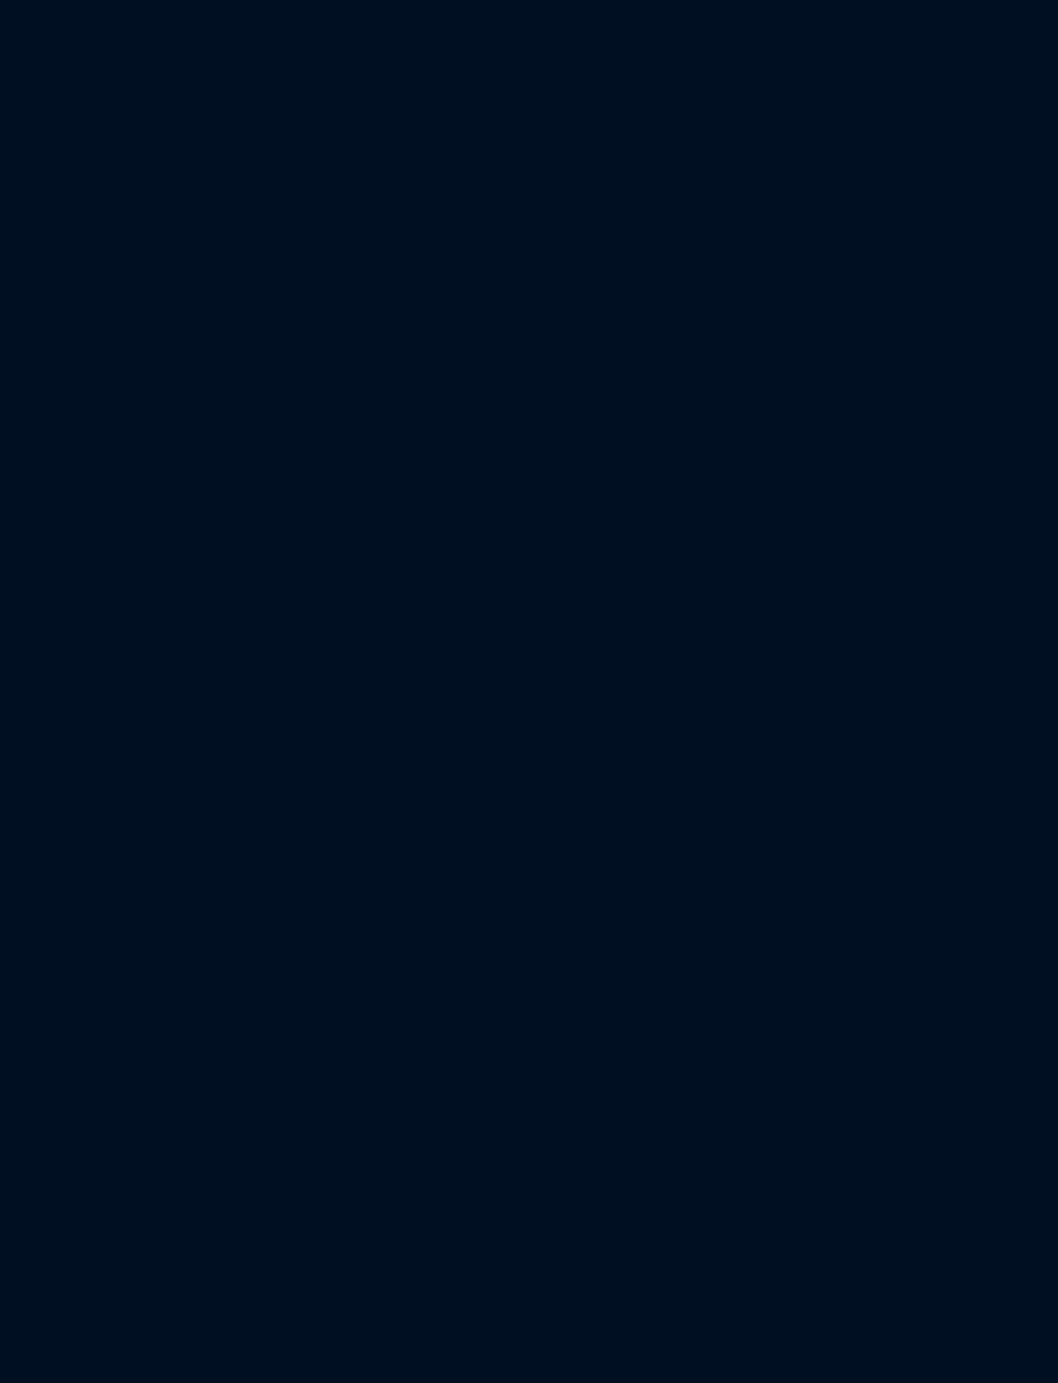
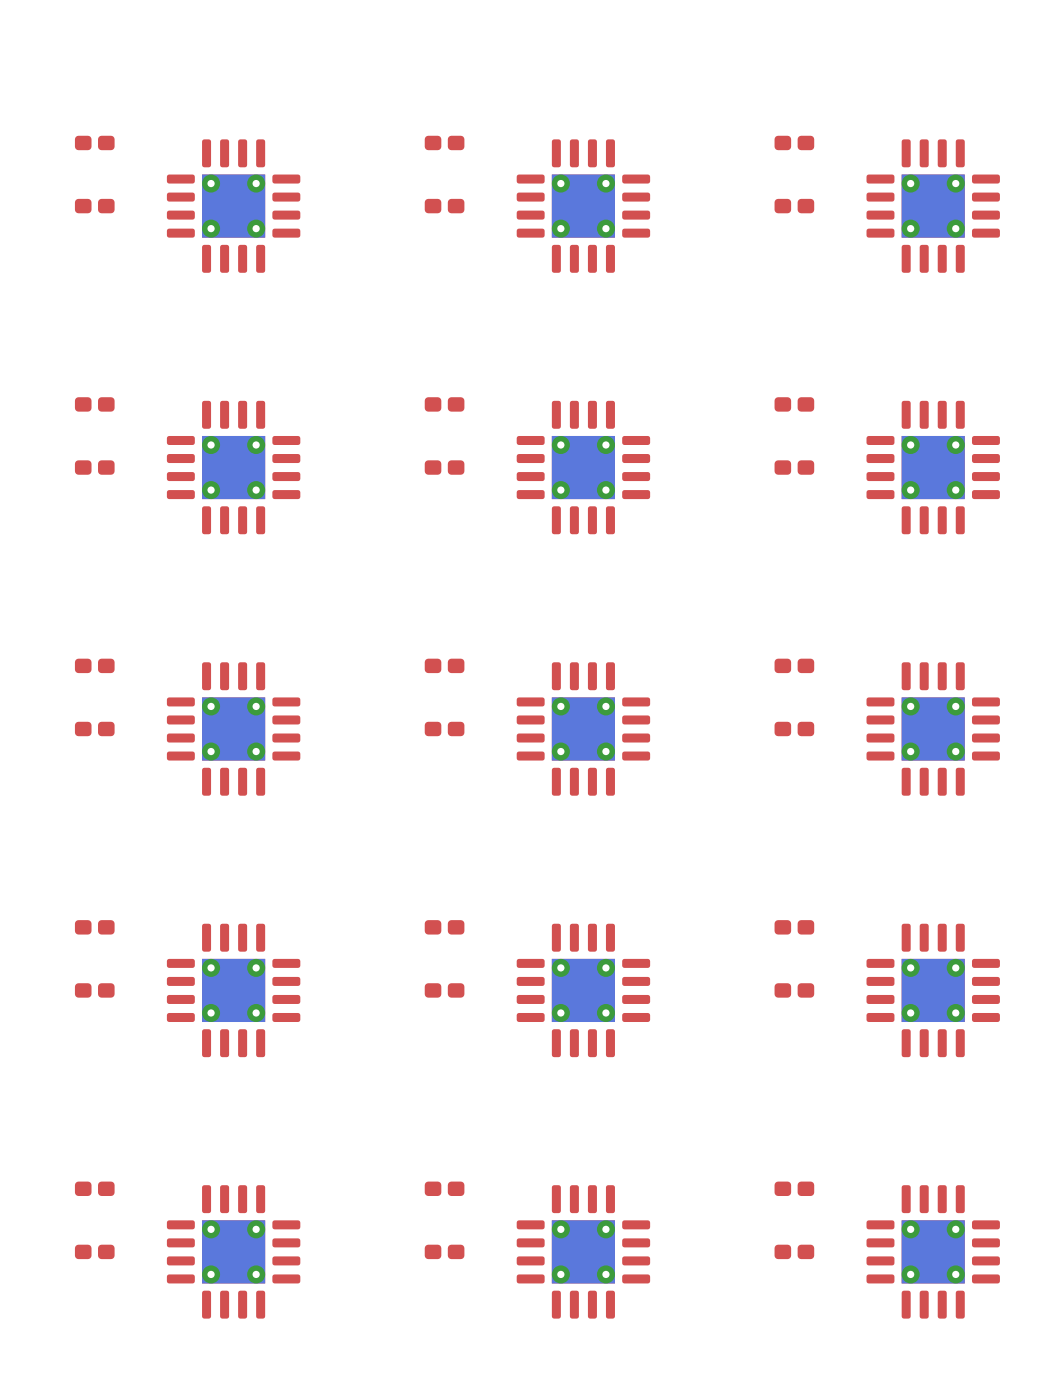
part: none -> (94, 142)
part: none -> (444, 142)
part: none -> (794, 142)
part: none -> (94, 206)
part: none -> (233, 206)
part: none -> (444, 206)
part: none -> (583, 206)
part: none -> (794, 206)
part: none -> (933, 206)
part: none -> (94, 404)
part: none -> (444, 404)
part: none -> (794, 404)
part: none -> (94, 467)
part: none -> (233, 467)
part: none -> (444, 467)
part: none -> (583, 467)
part: none -> (794, 467)
part: none -> (933, 467)
part: none -> (94, 665)
part: none -> (444, 665)
part: none -> (794, 665)
part: none -> (94, 728)
part: none -> (233, 728)
part: none -> (444, 728)
part: none -> (583, 728)
part: none -> (794, 728)
part: none -> (933, 728)
part: none -> (94, 927)
part: none -> (444, 927)
part: none -> (794, 927)
part: none -> (94, 990)
part: none -> (233, 990)
part: none -> (444, 990)
part: none -> (583, 990)
part: none -> (794, 990)
part: none -> (933, 990)
part: none -> (94, 1188)
part: none -> (444, 1188)
part: none -> (794, 1188)
part: none -> (94, 1251)
part: none -> (233, 1251)
part: none -> (444, 1251)
part: none -> (583, 1251)
part: none -> (794, 1251)
part: none -> (933, 1251)

